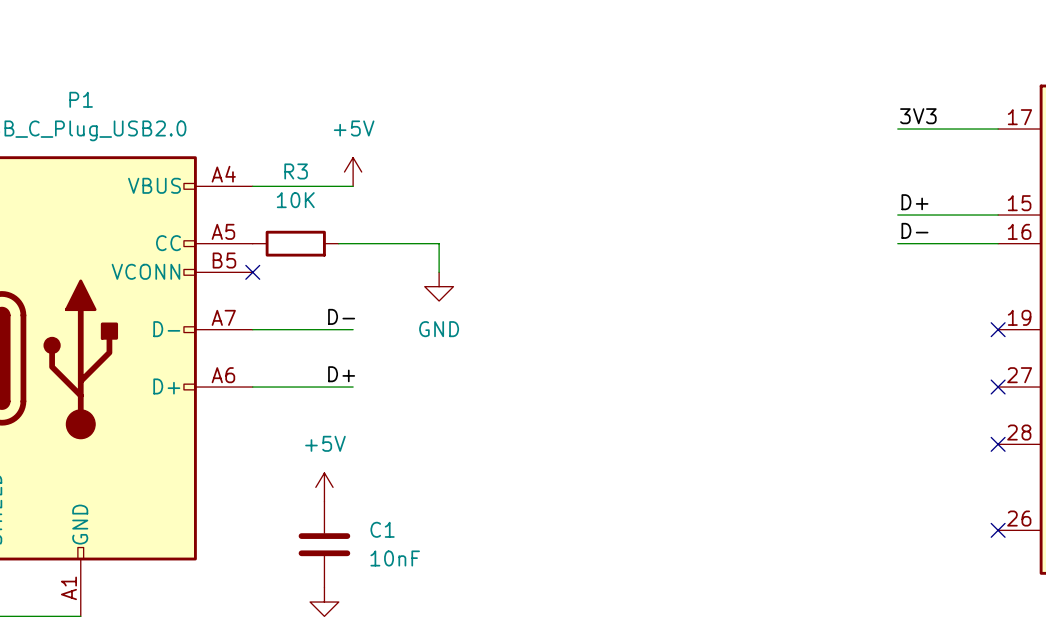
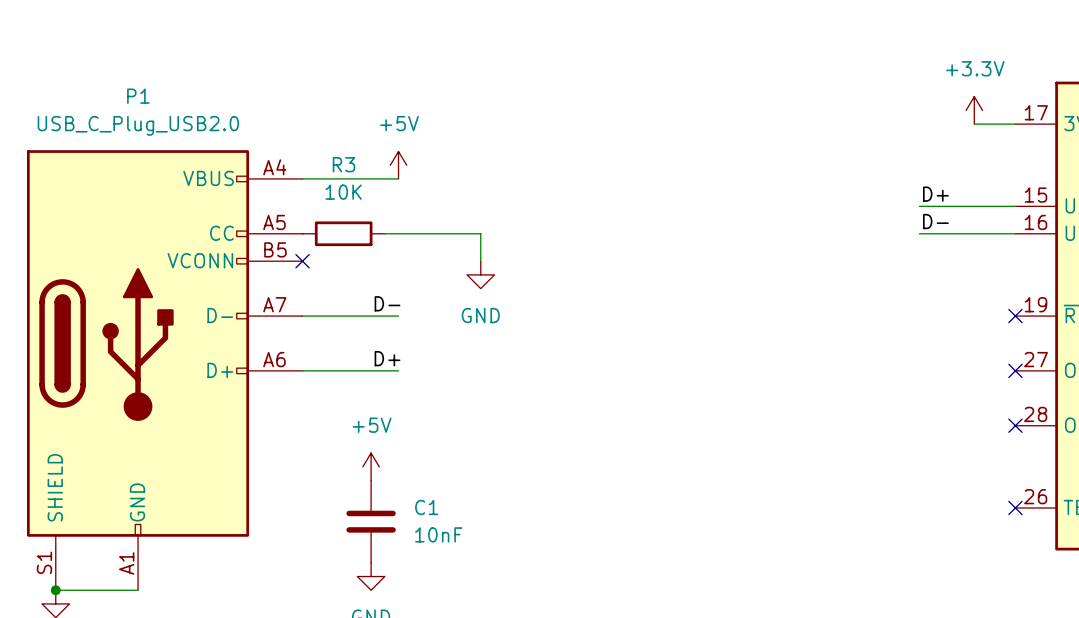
power symbol: none -> +3.3V (974, 110)
label: 3V3 (918, 116) -> none
wire: (897, 129) (955, 129) -> none

